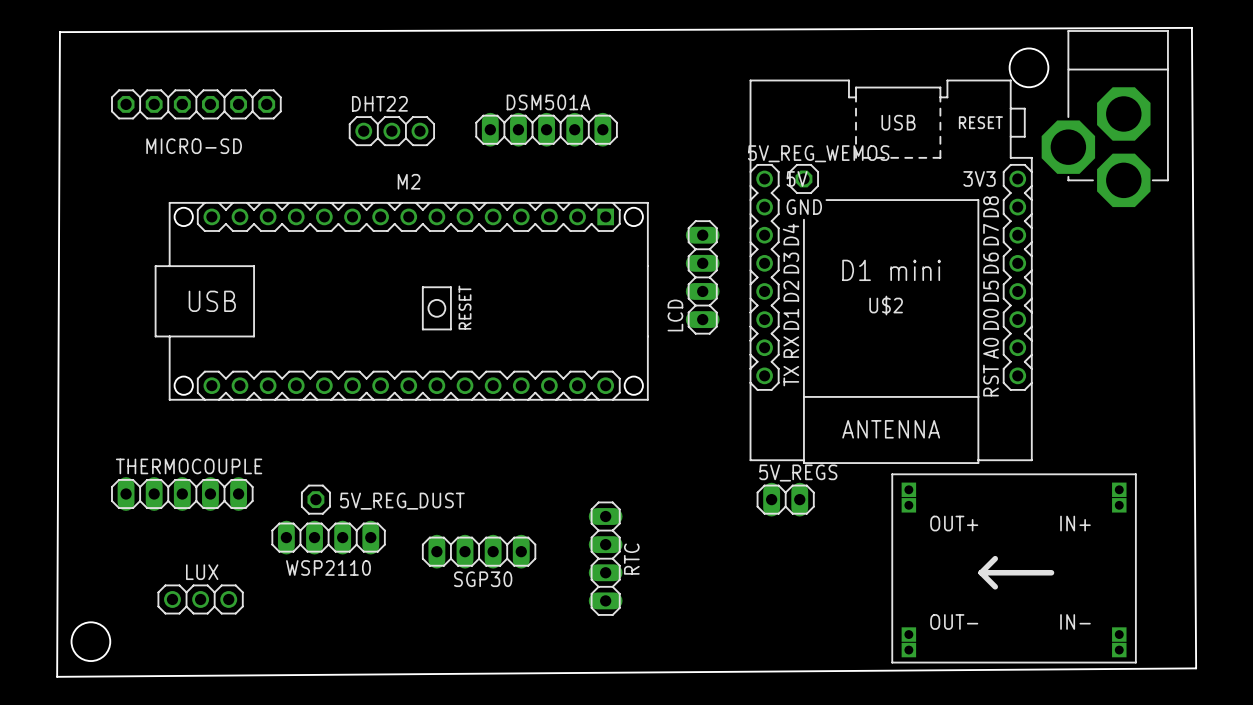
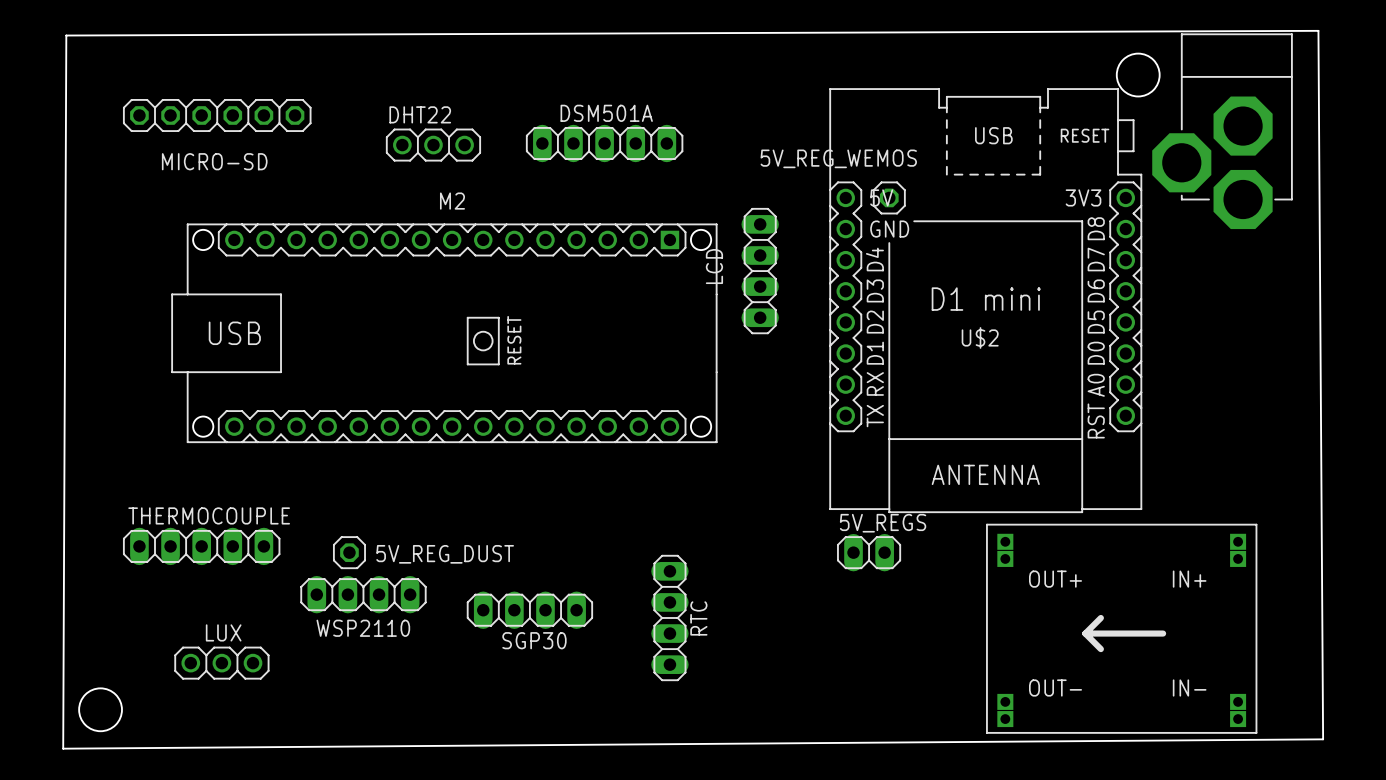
5V_REG_WEMOS name position: 5V_REG_WEMOS (818, 153) -> 5V_REG_WEMOS (838, 158)
LCD position: (702, 277) -> (760, 271)
LCD name position: LCD (675, 315) -> LCD (714, 266)

